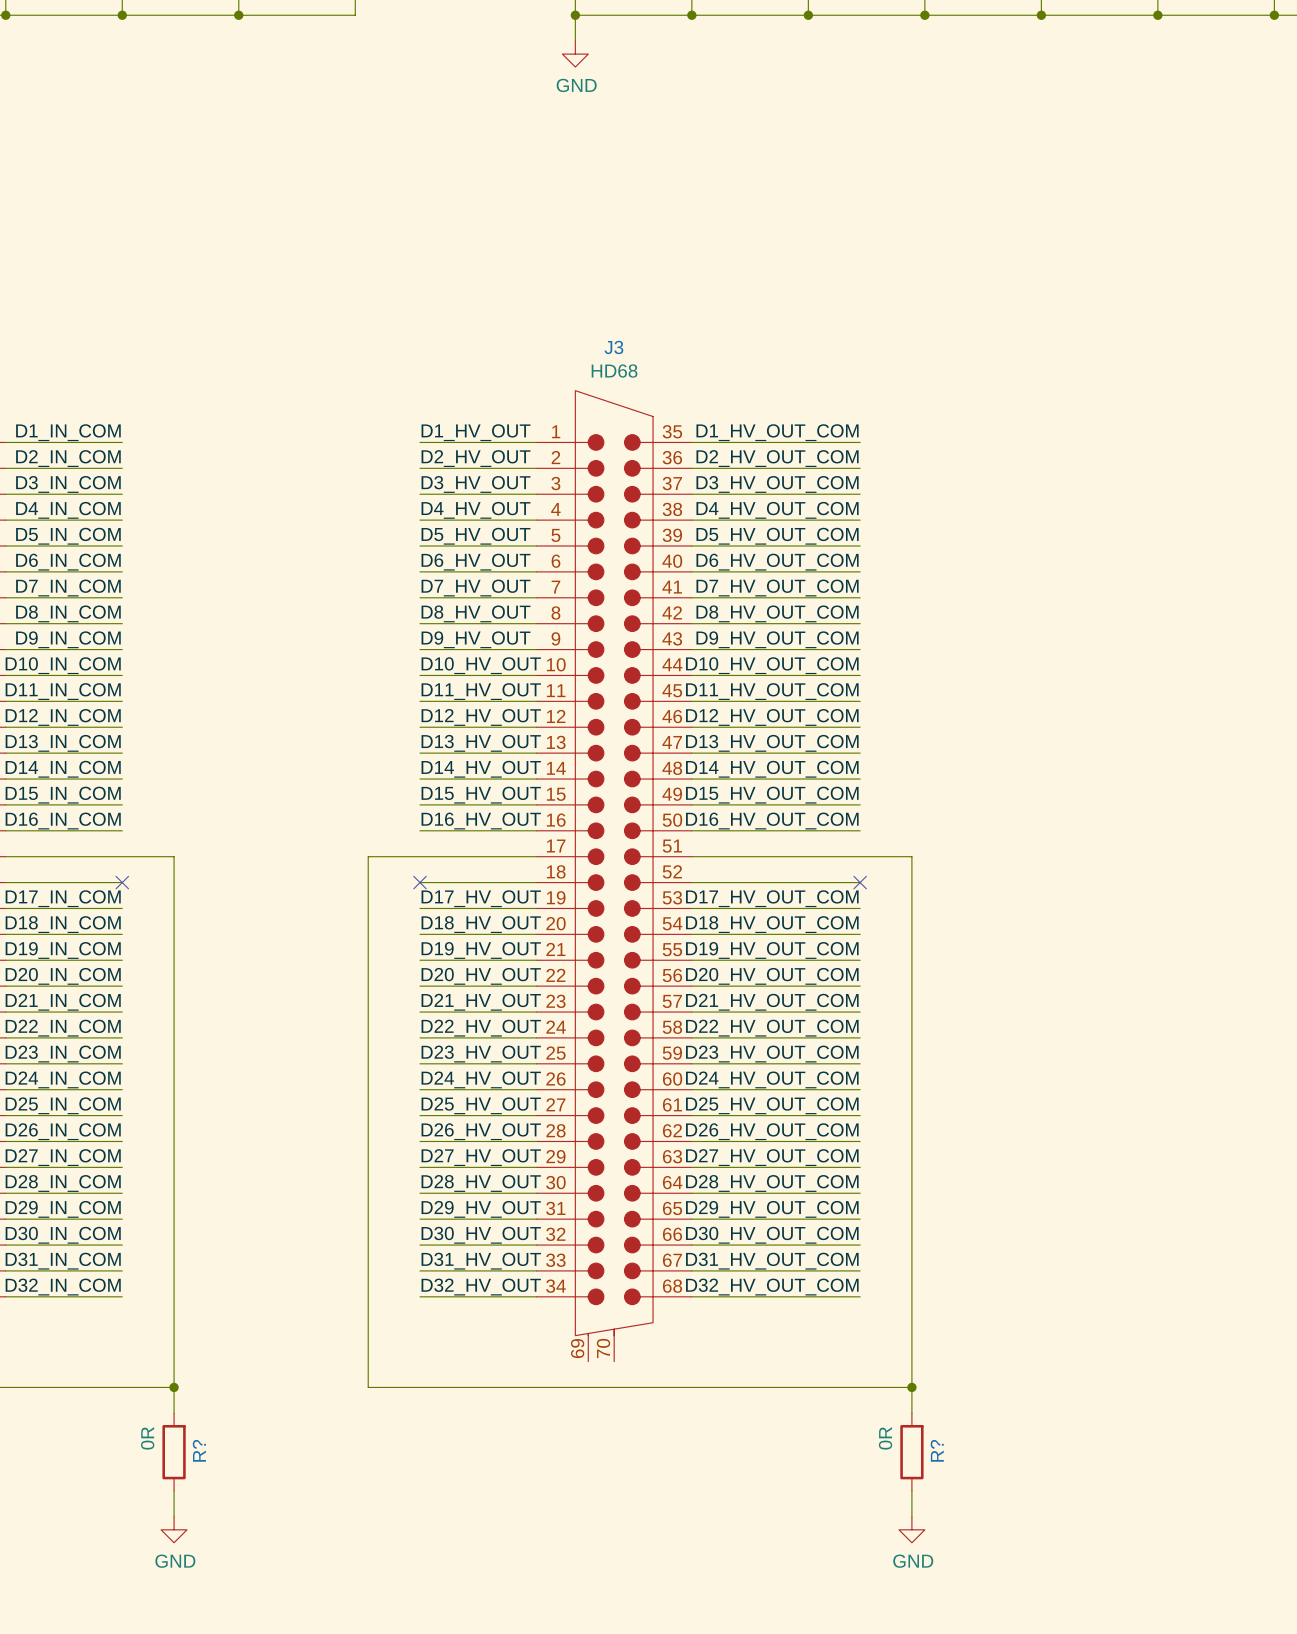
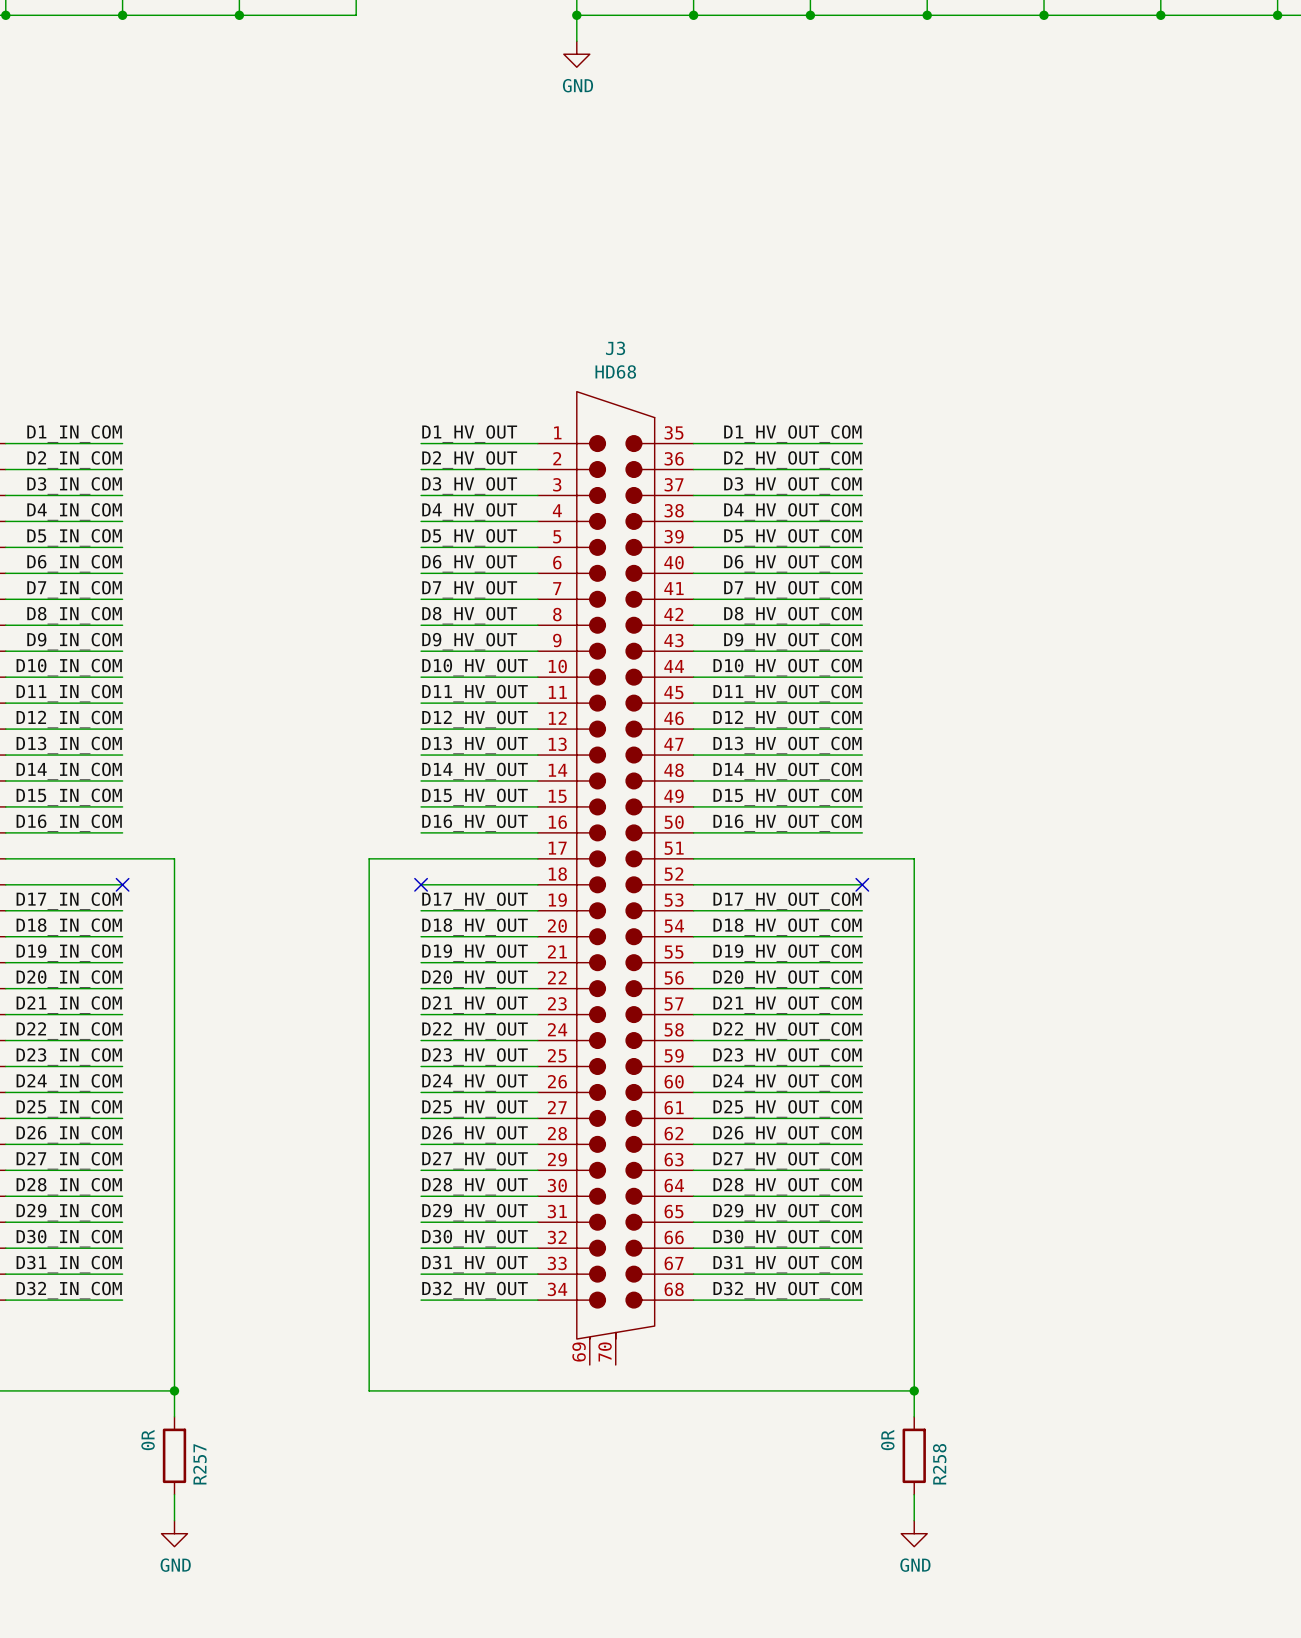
R? name: R? (199, 1450) -> R257 (199, 1464)
R? name: R? (937, 1450) -> R258 (939, 1464)

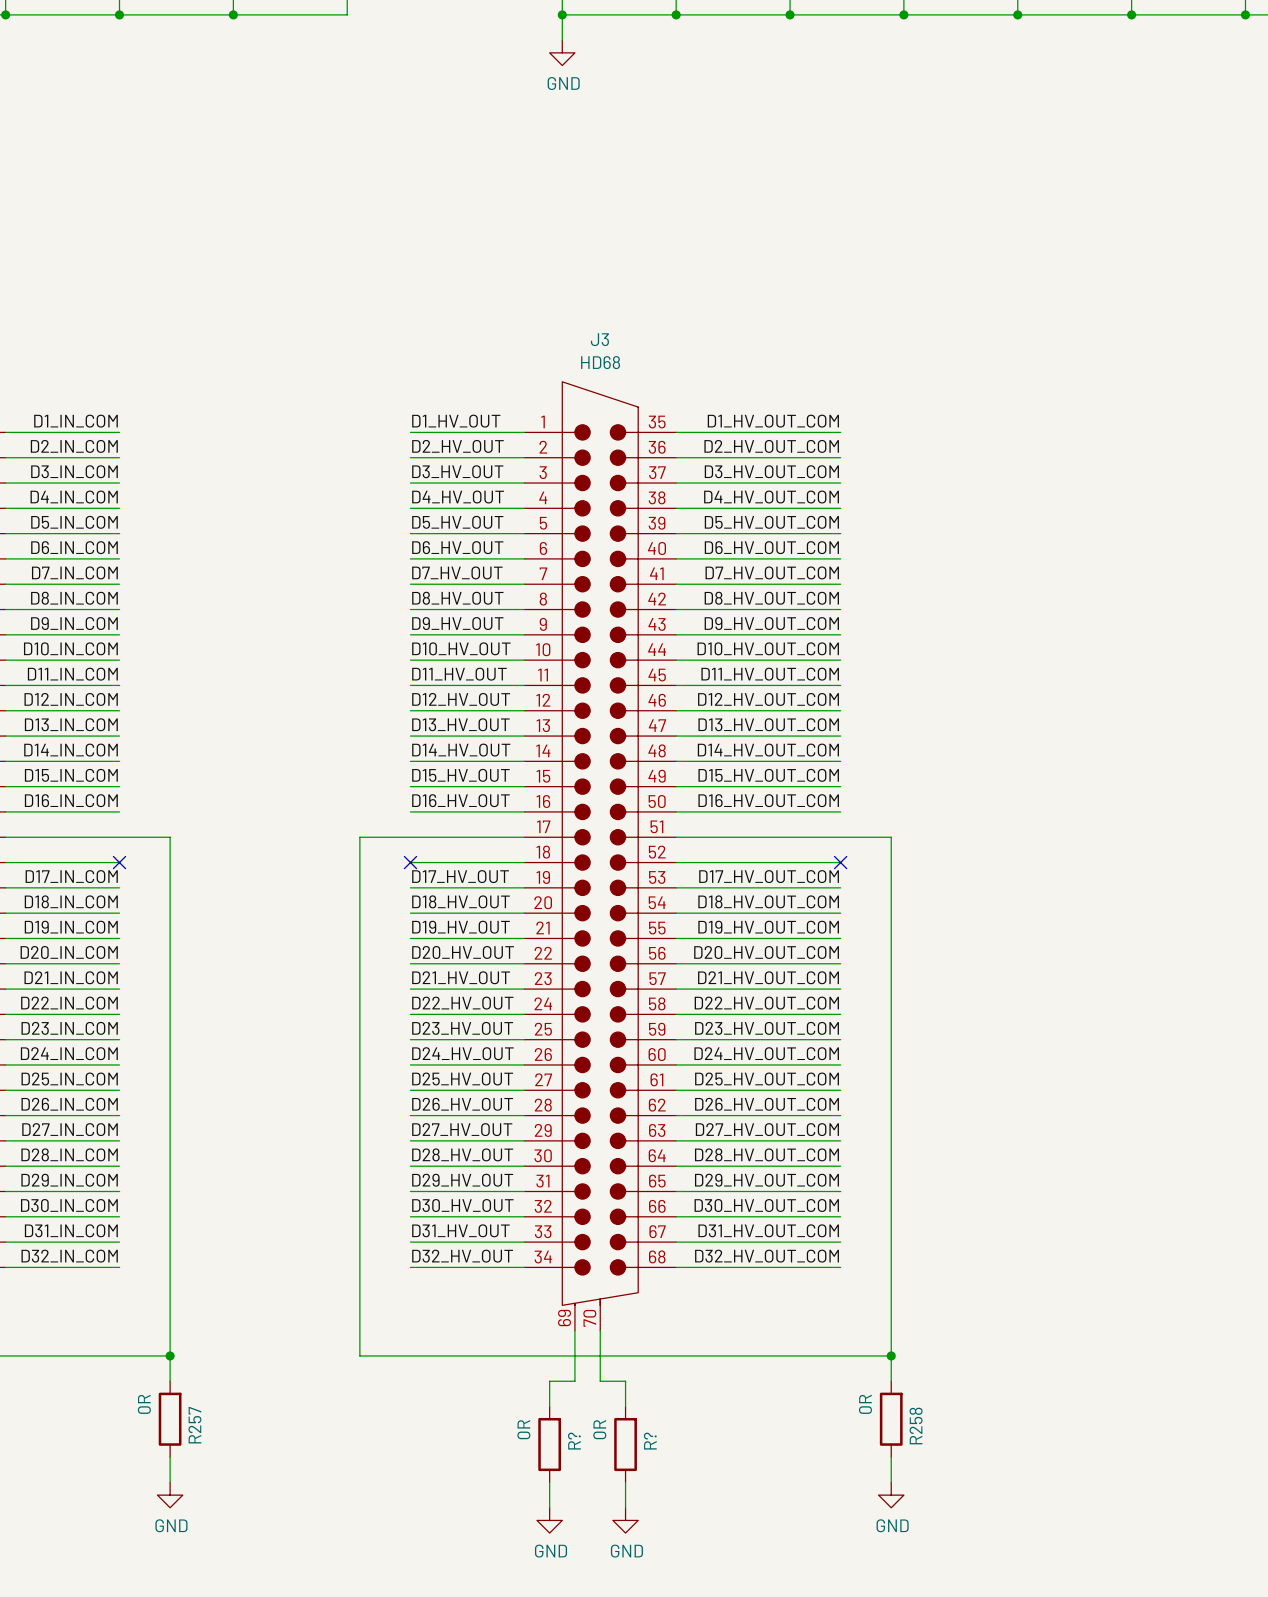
wire: none -> (574, 1330) (574, 1381) (549, 1381) (549, 1406)
wire: none -> (600, 1330) (600, 1381) (625, 1381) (625, 1406)
R?: none -> 0R (549, 1444)
R?: none -> 0R (625, 1444)
wire: none -> (549, 1482) (549, 1507)
wire: none -> (625, 1482) (625, 1507)
power symbol: none -> GND (549, 1520)
power symbol: none -> GND (625, 1520)

